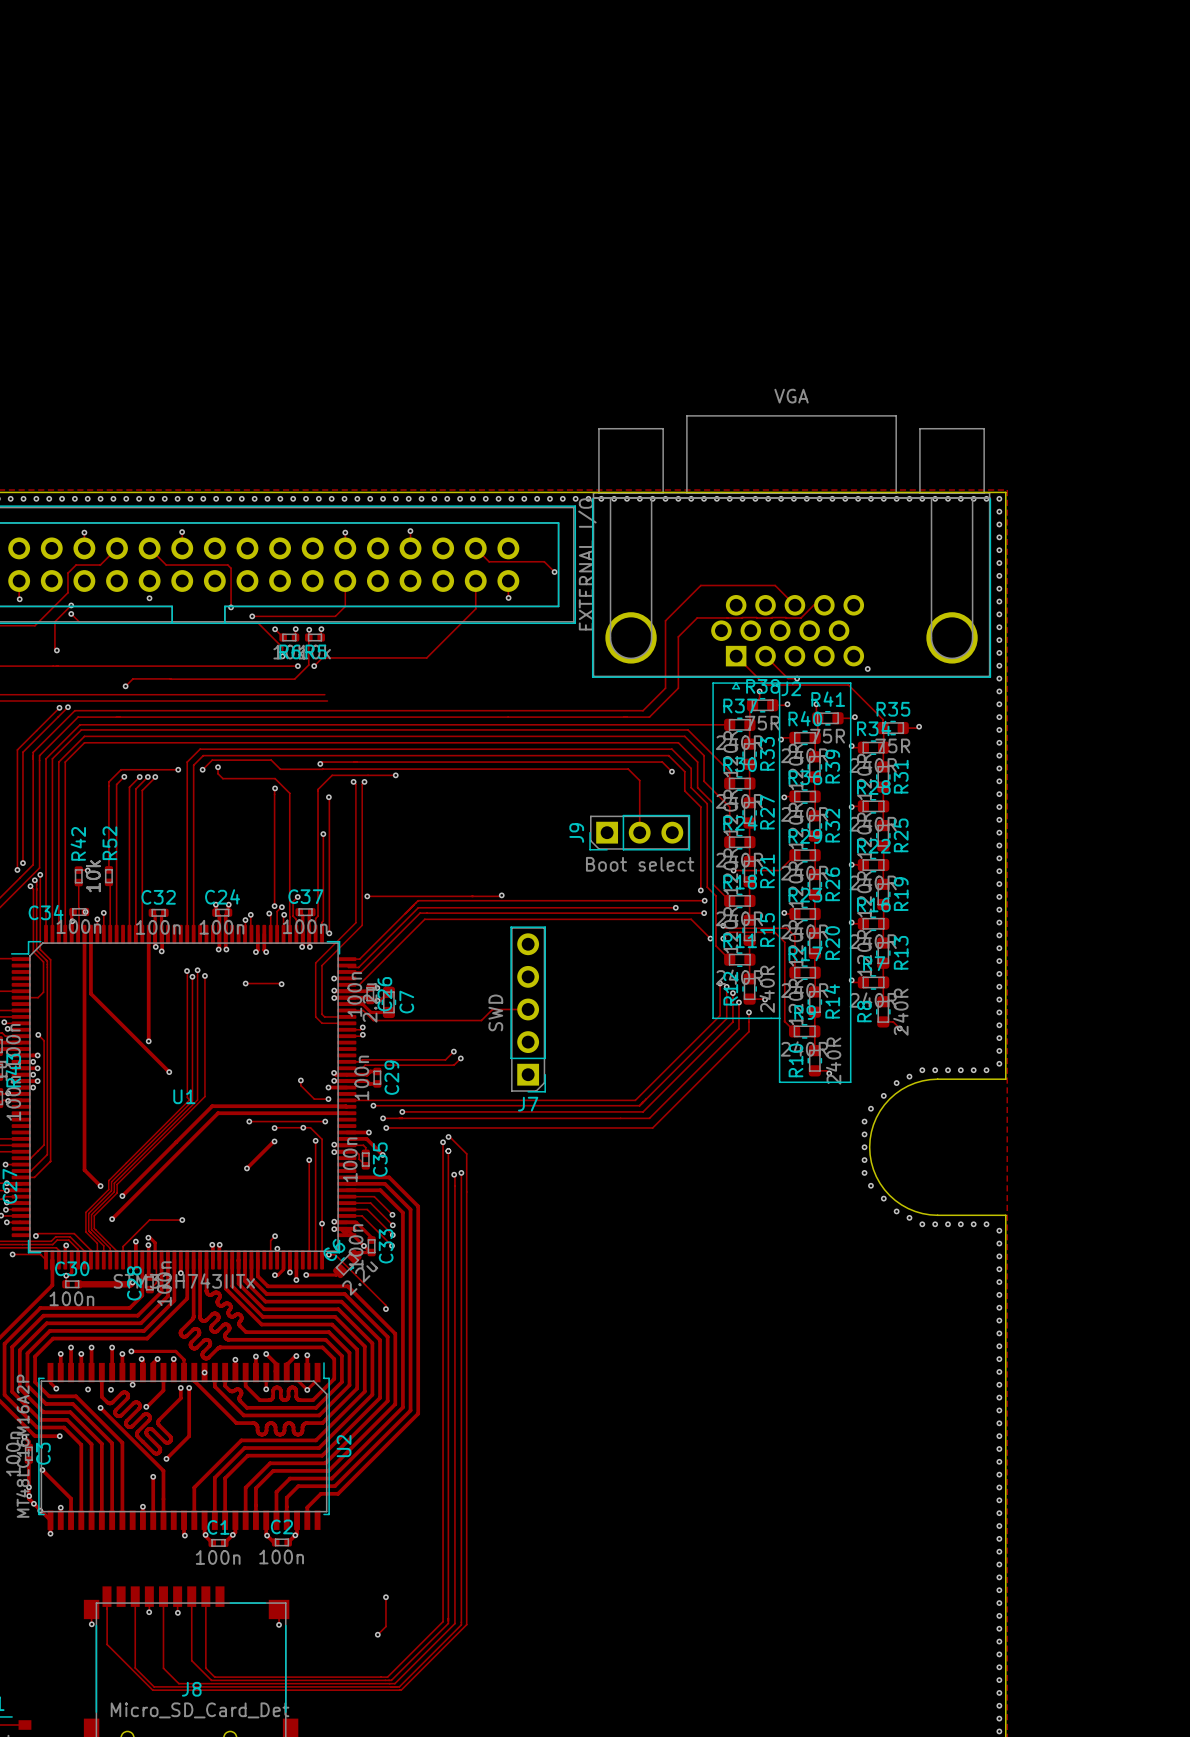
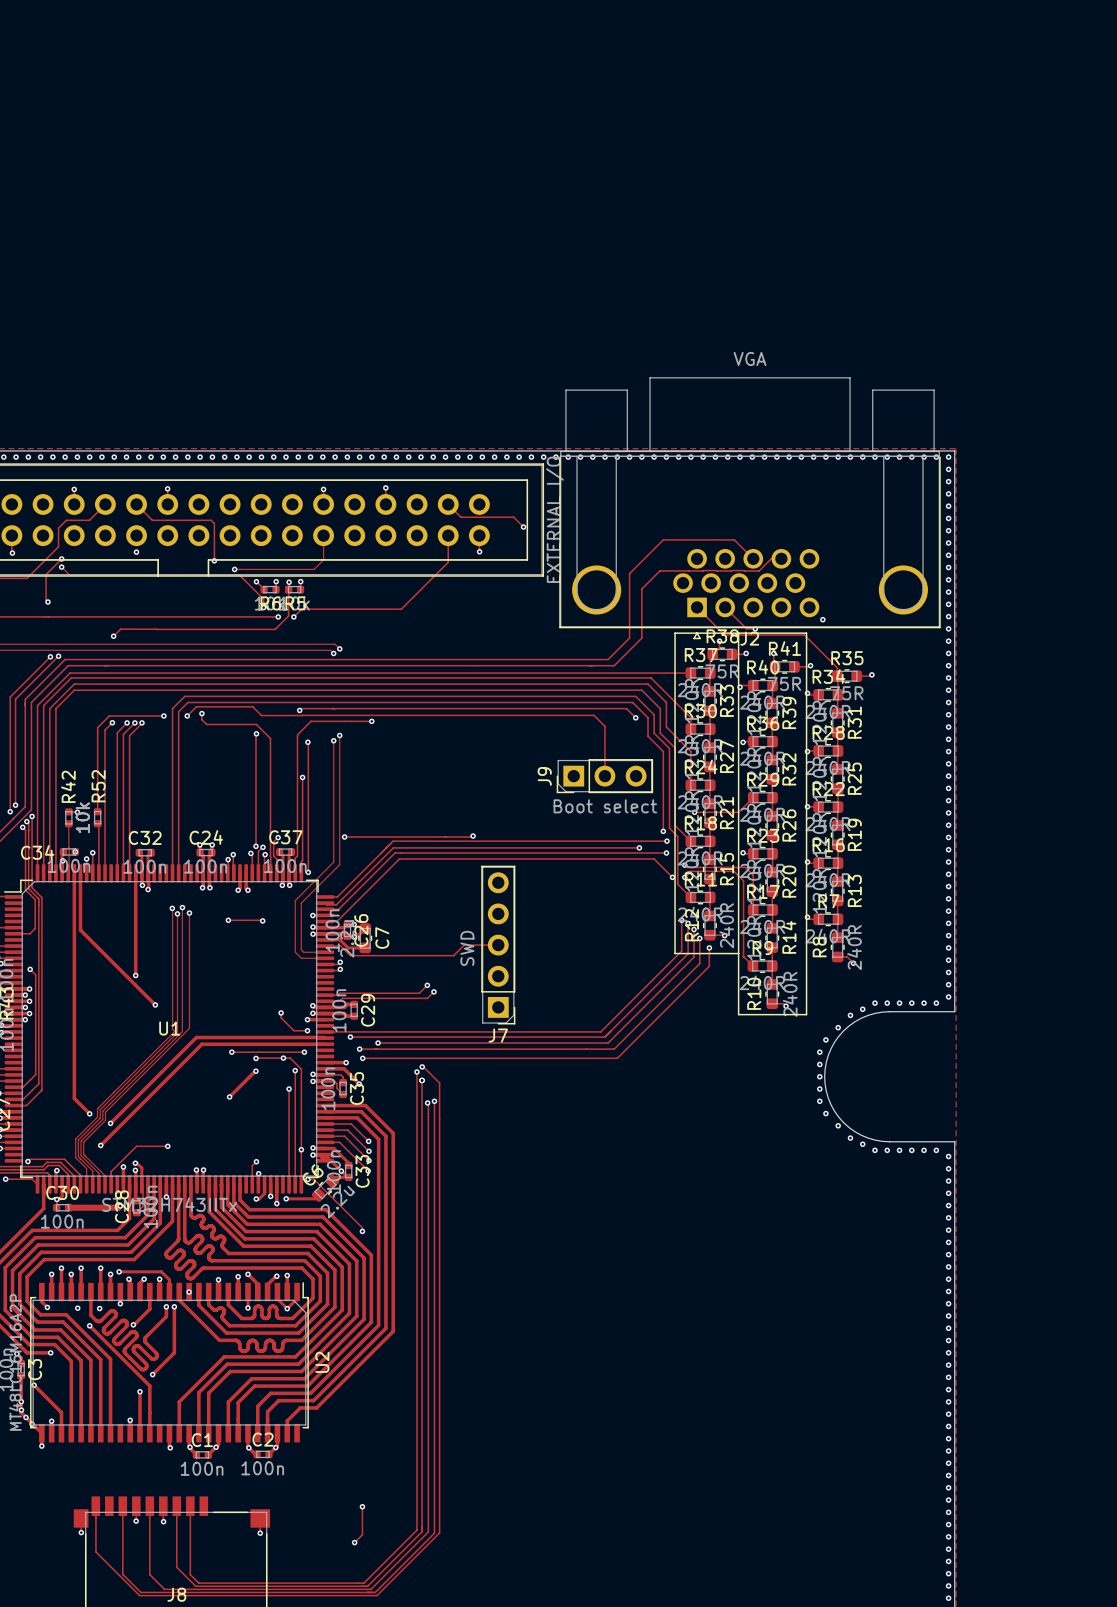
track: none -> (304, 644) (335, 644) (339, 648)
via: none -> (339, 648)
track: none -> (306, 650) (330, 650) (333, 653)
via: none -> (333, 653)
track: (353, 781) (355, 784) (355, 795) -> none
via: (353, 781) -> none
track: (364, 781) (362, 784) (362, 790) -> none
via: (364, 781) -> none
via: none -> (339, 735)
via: none -> (333, 740)

